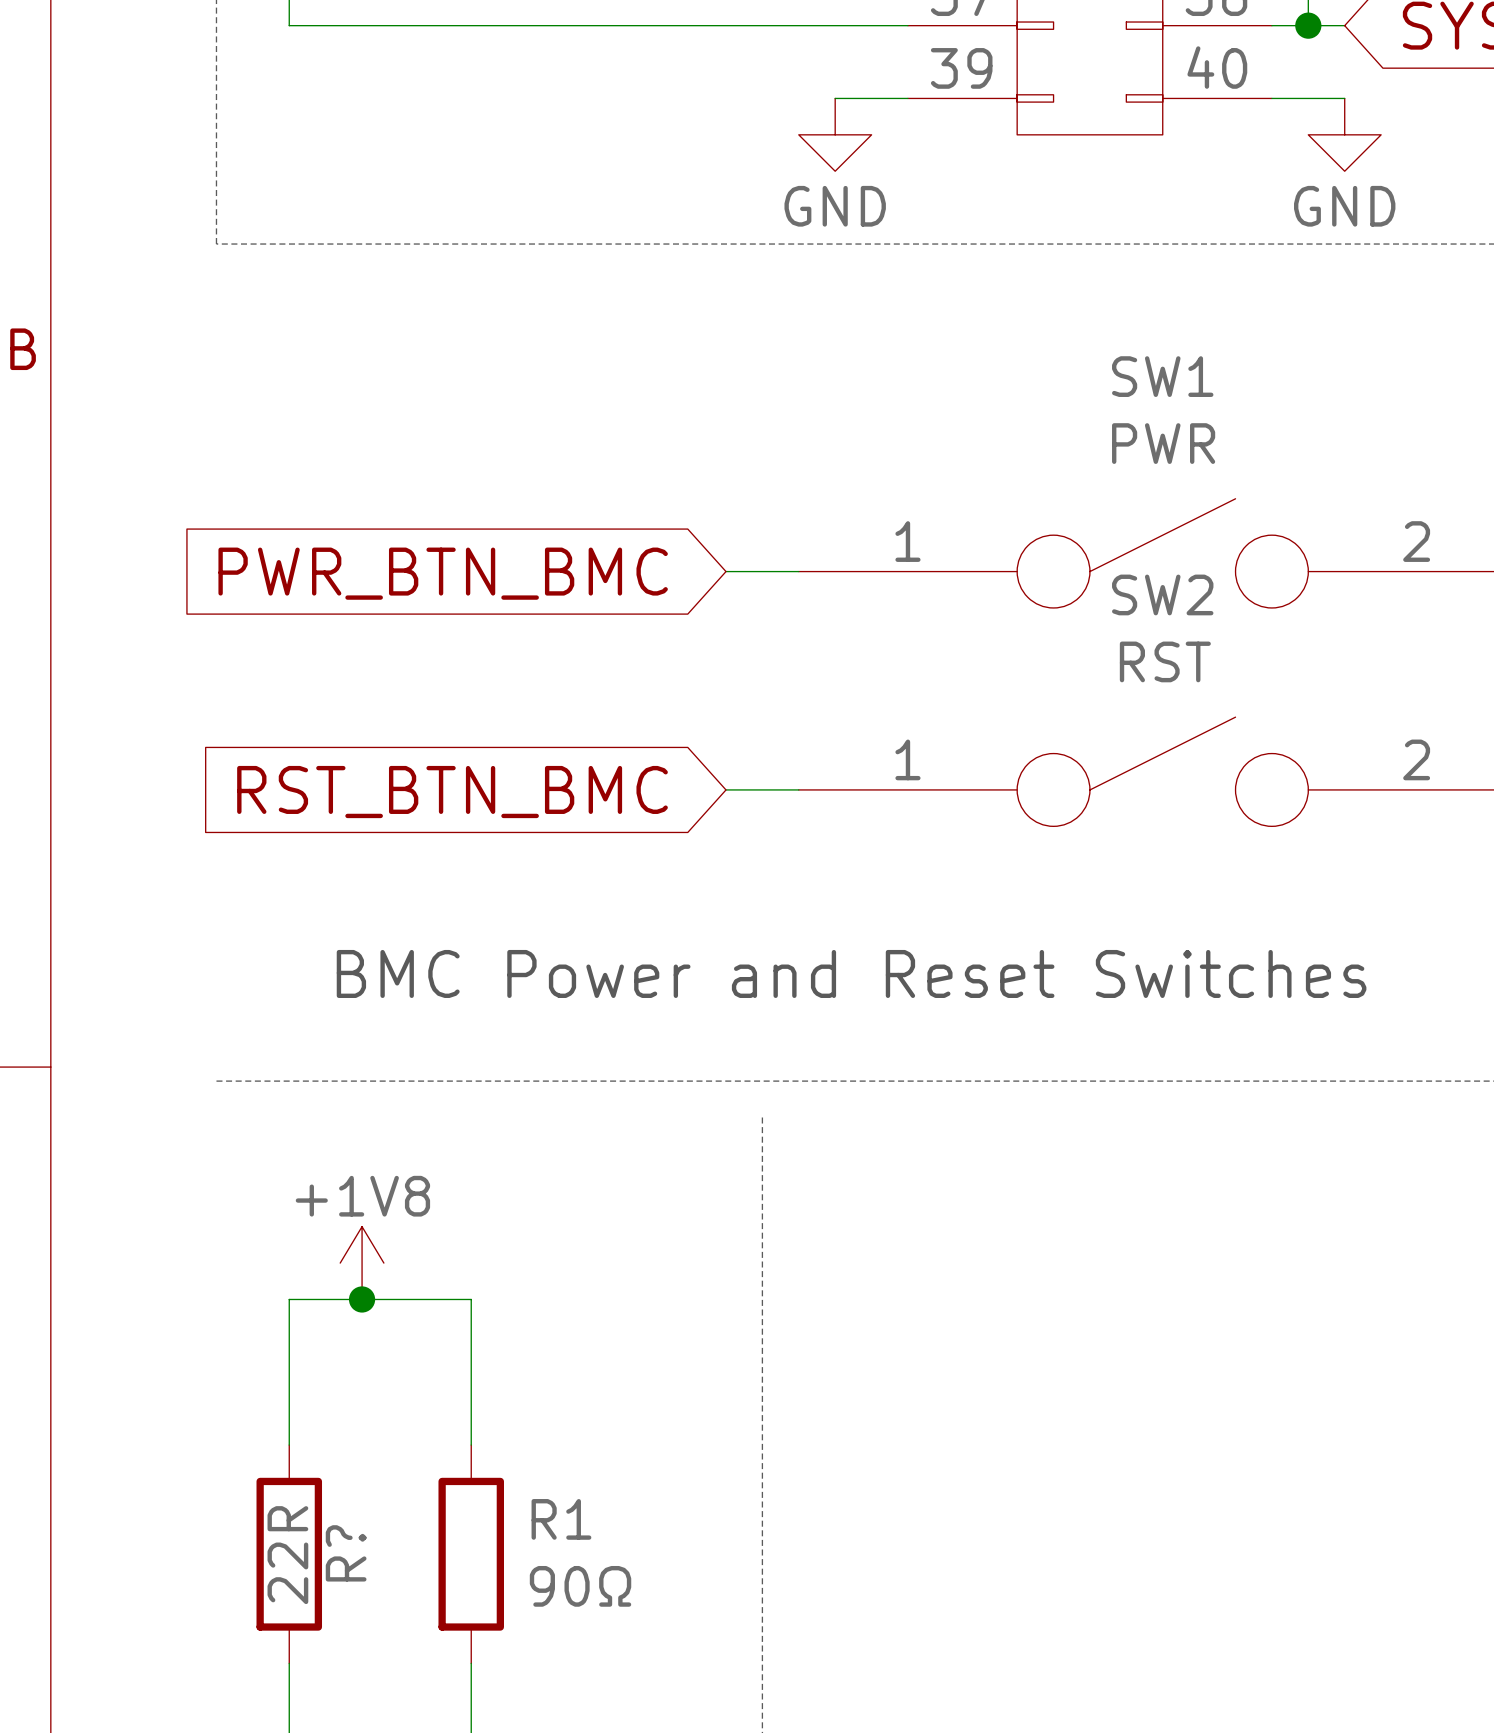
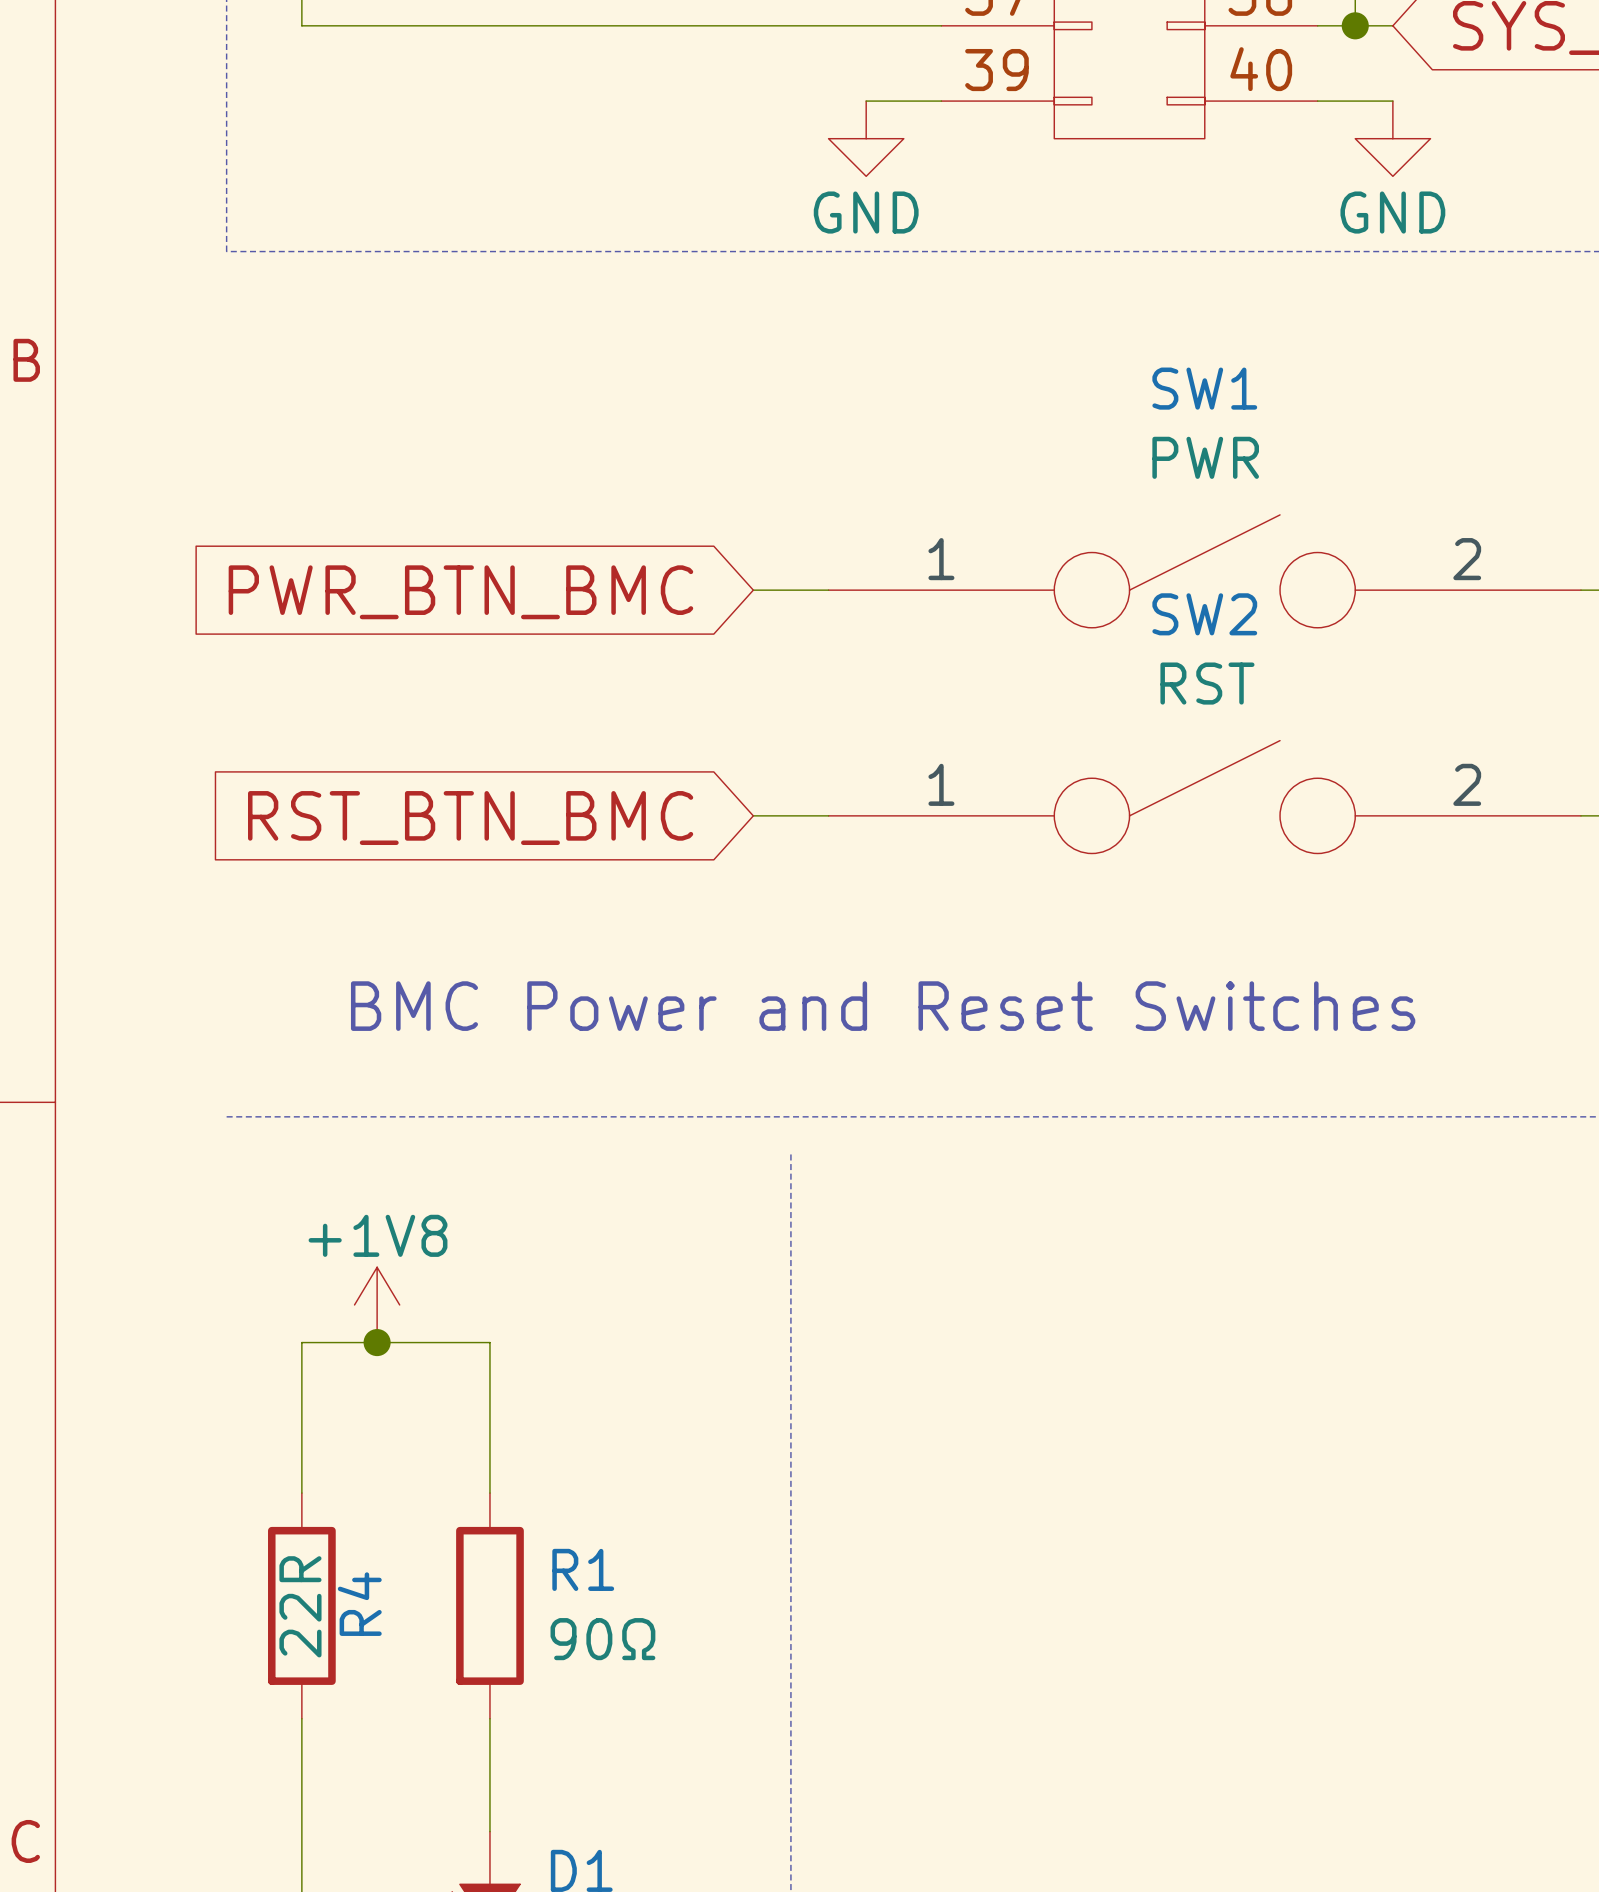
R? name: R? (346, 1553) -> R4 (359, 1604)

